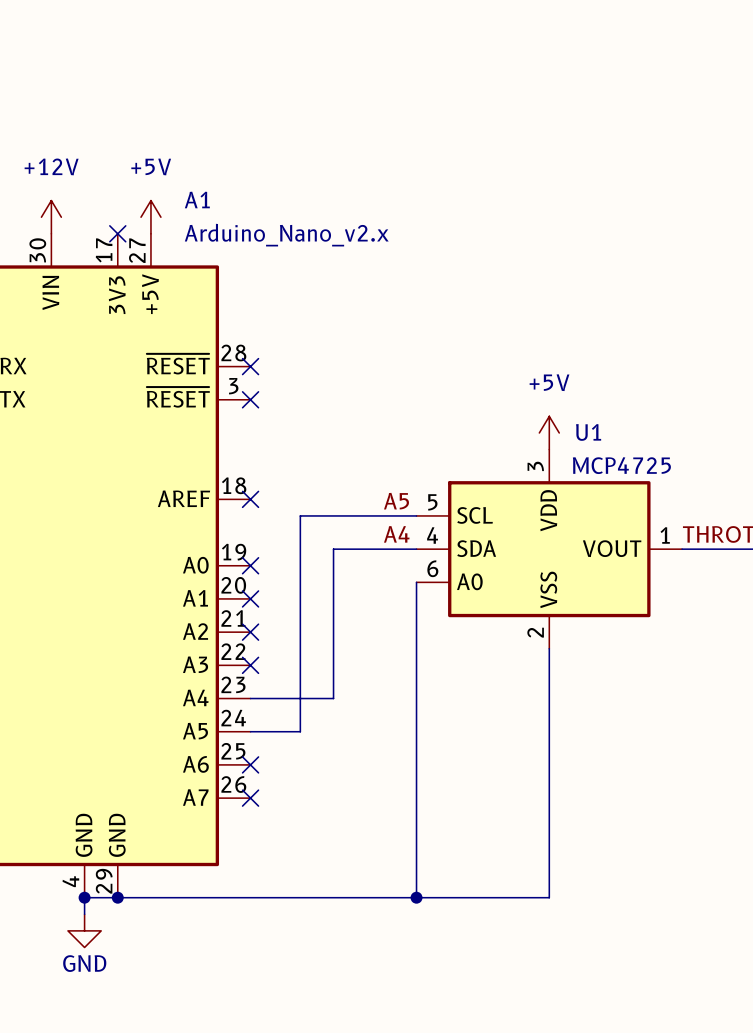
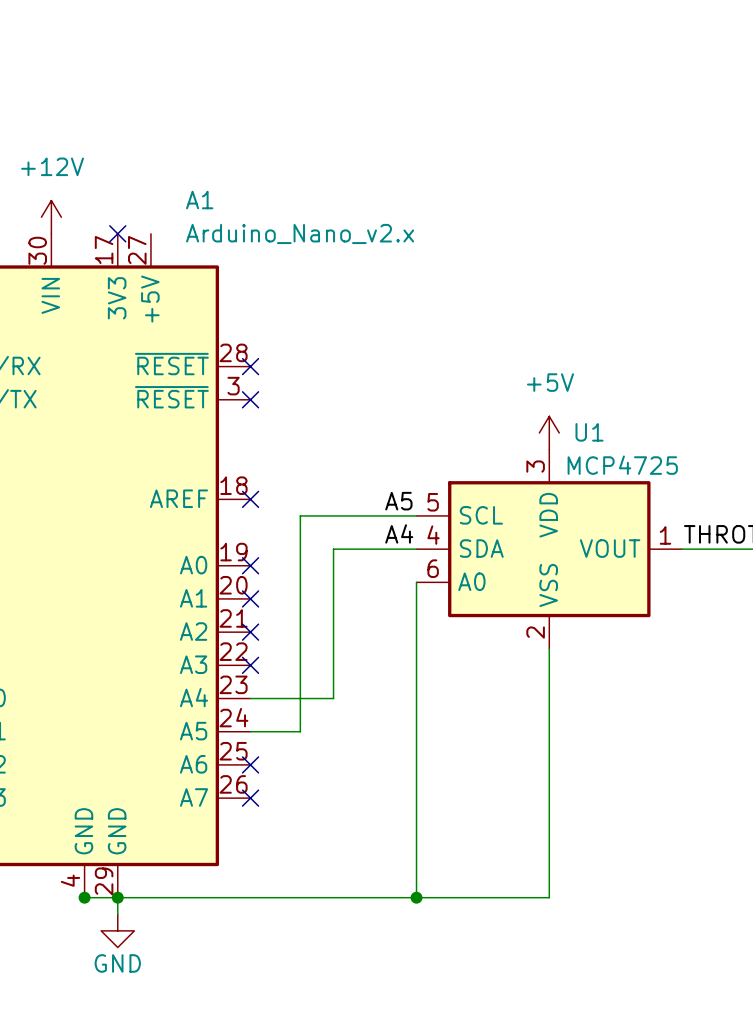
power symbol: +5V (150, 217) -> none
wire: (84, 897) (84, 914) -> (117, 897) (117, 914)
power symbol position: GND (84, 930) -> GND (117, 930)

